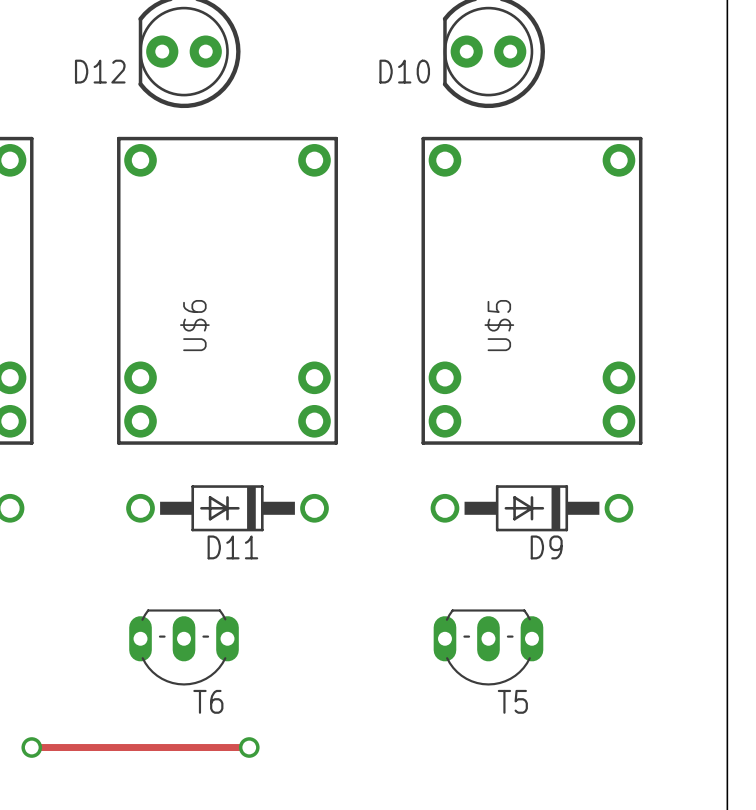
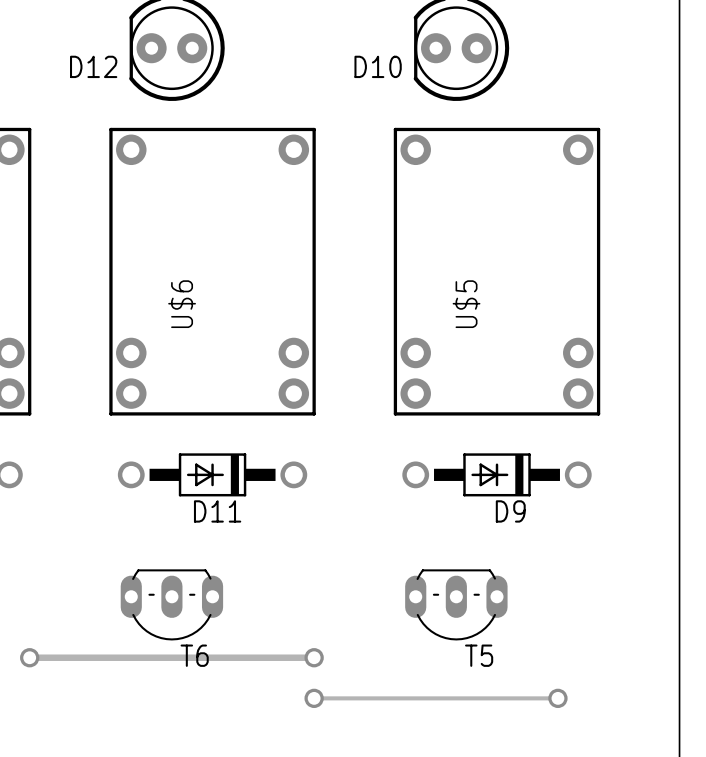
track: none -> (29, 657) (314, 657)
via: none -> (29, 657)
via: none -> (314, 657)
track: (31, 747) (249, 747) -> none
via: (31, 747) -> none
via: (249, 747) -> none
track: none -> (314, 698) (557, 698)
via: none -> (314, 698)
via: none -> (557, 698)

